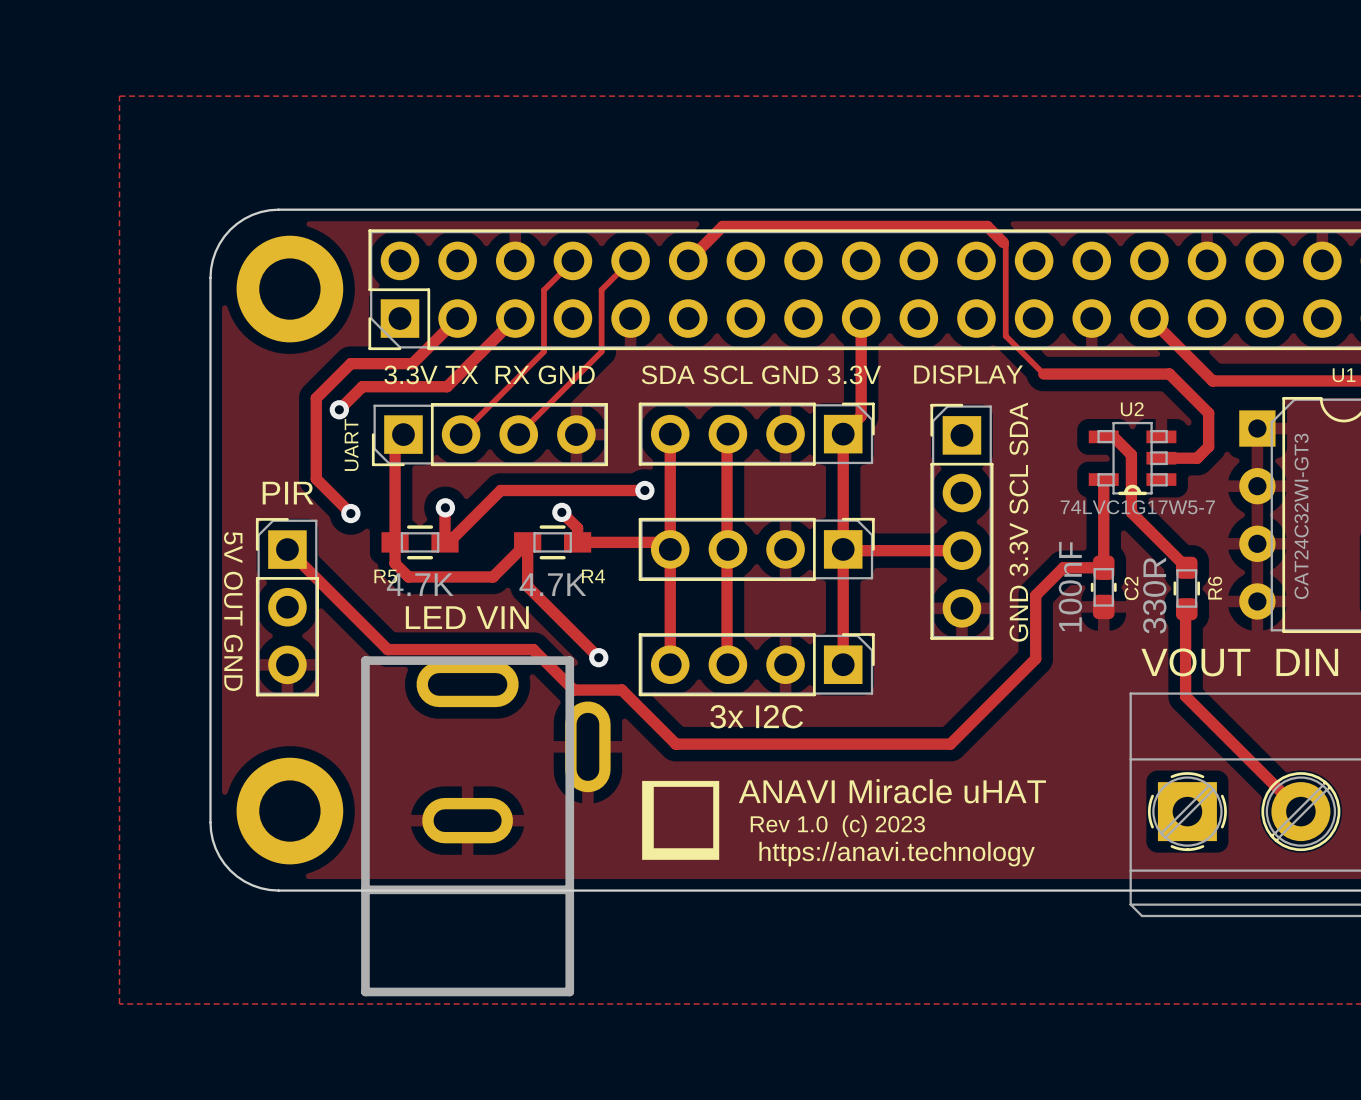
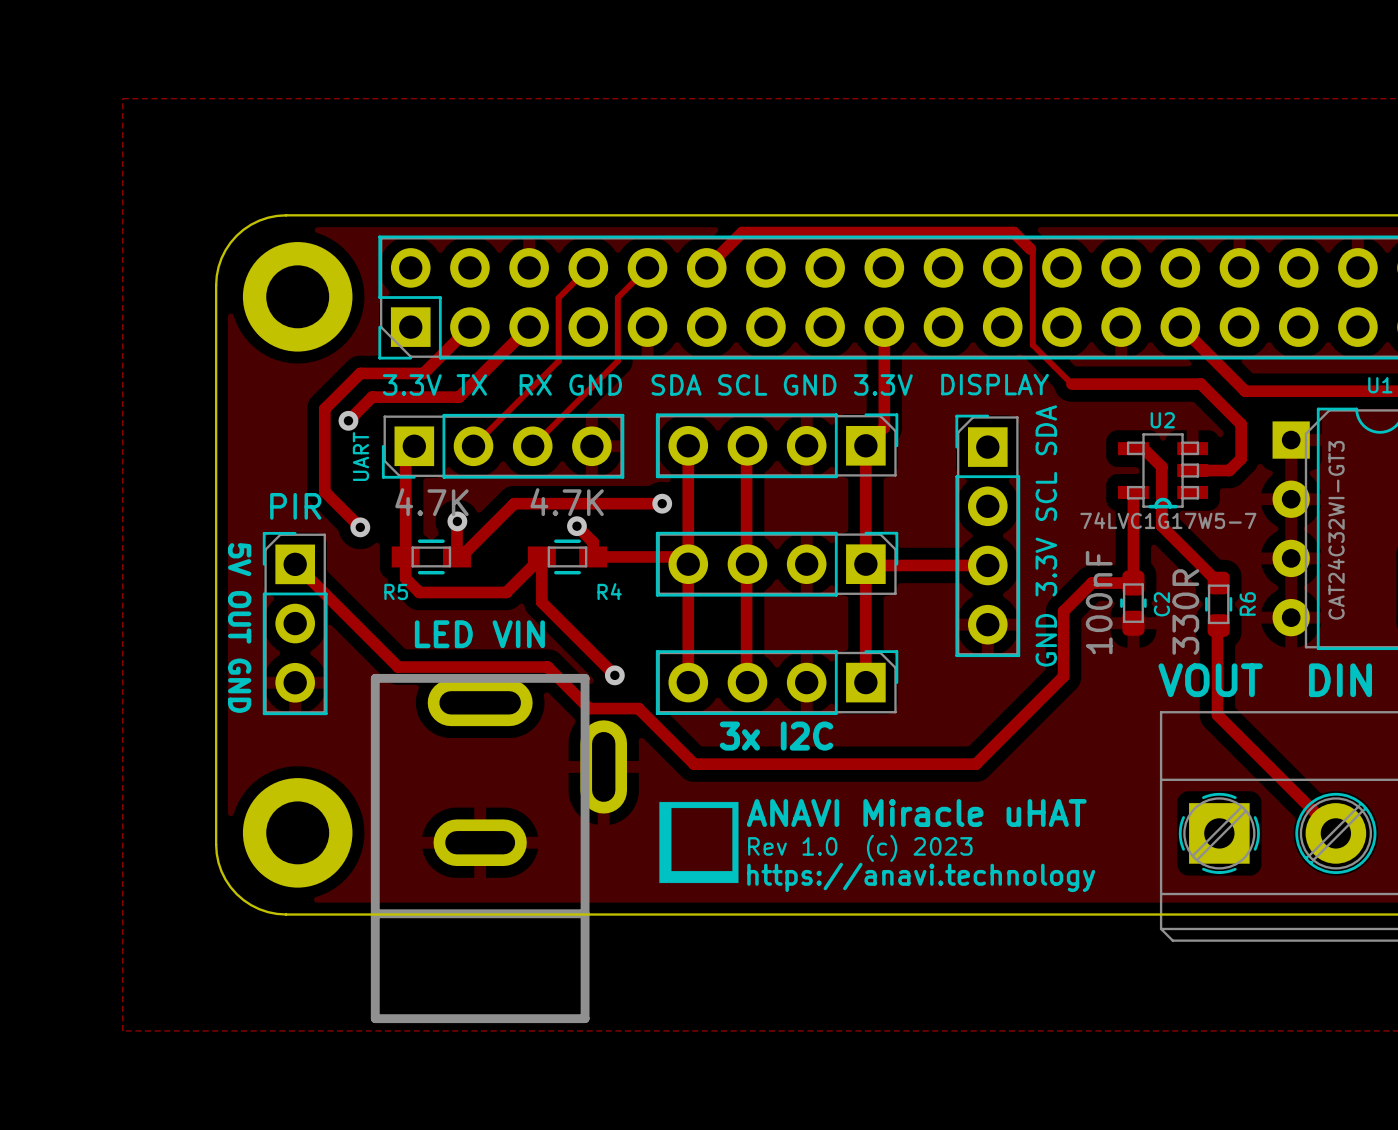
R5 value position: 4.7K (420, 584) -> 4.7K (431, 502)
R4 value position: 4.7K (552, 584) -> 4.7K (567, 502)

